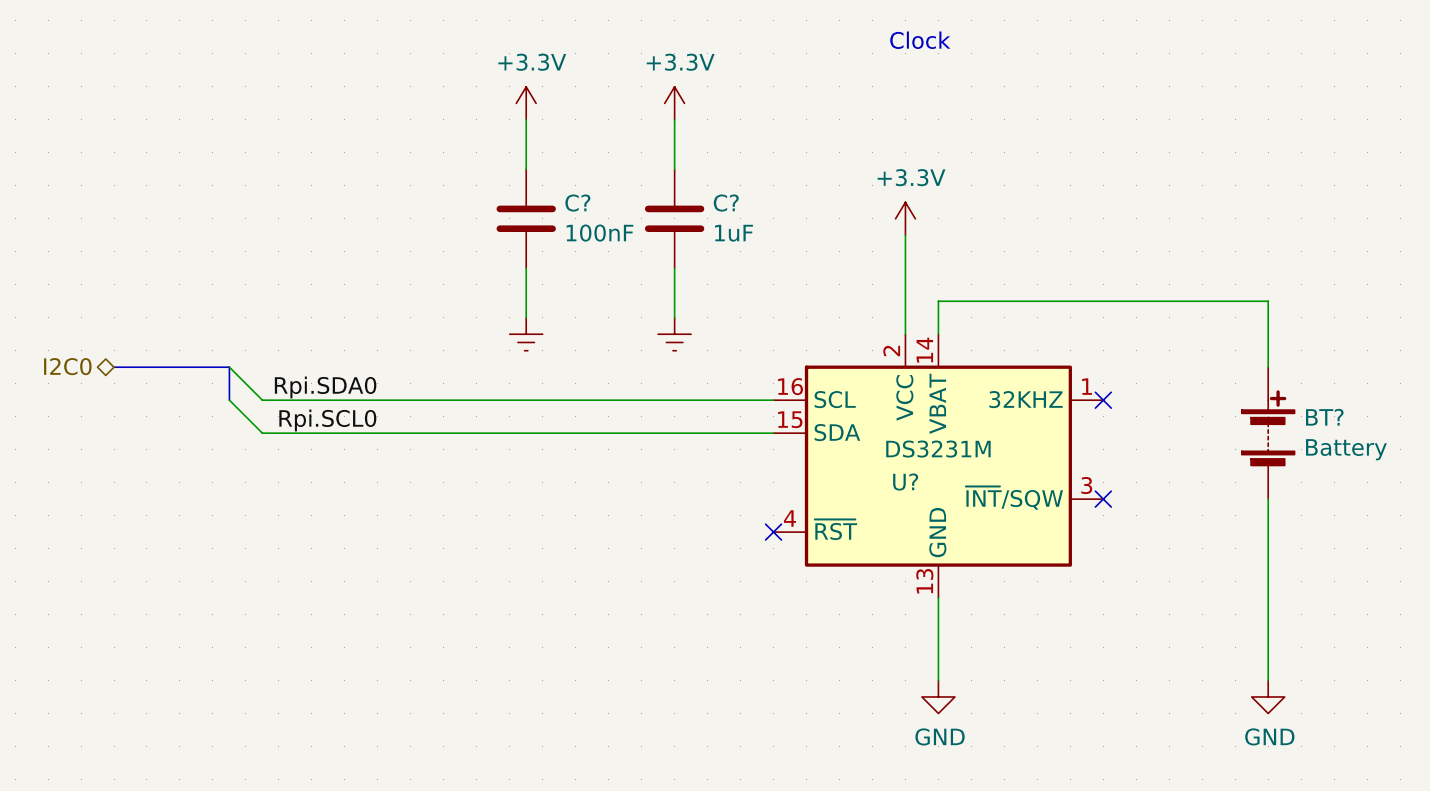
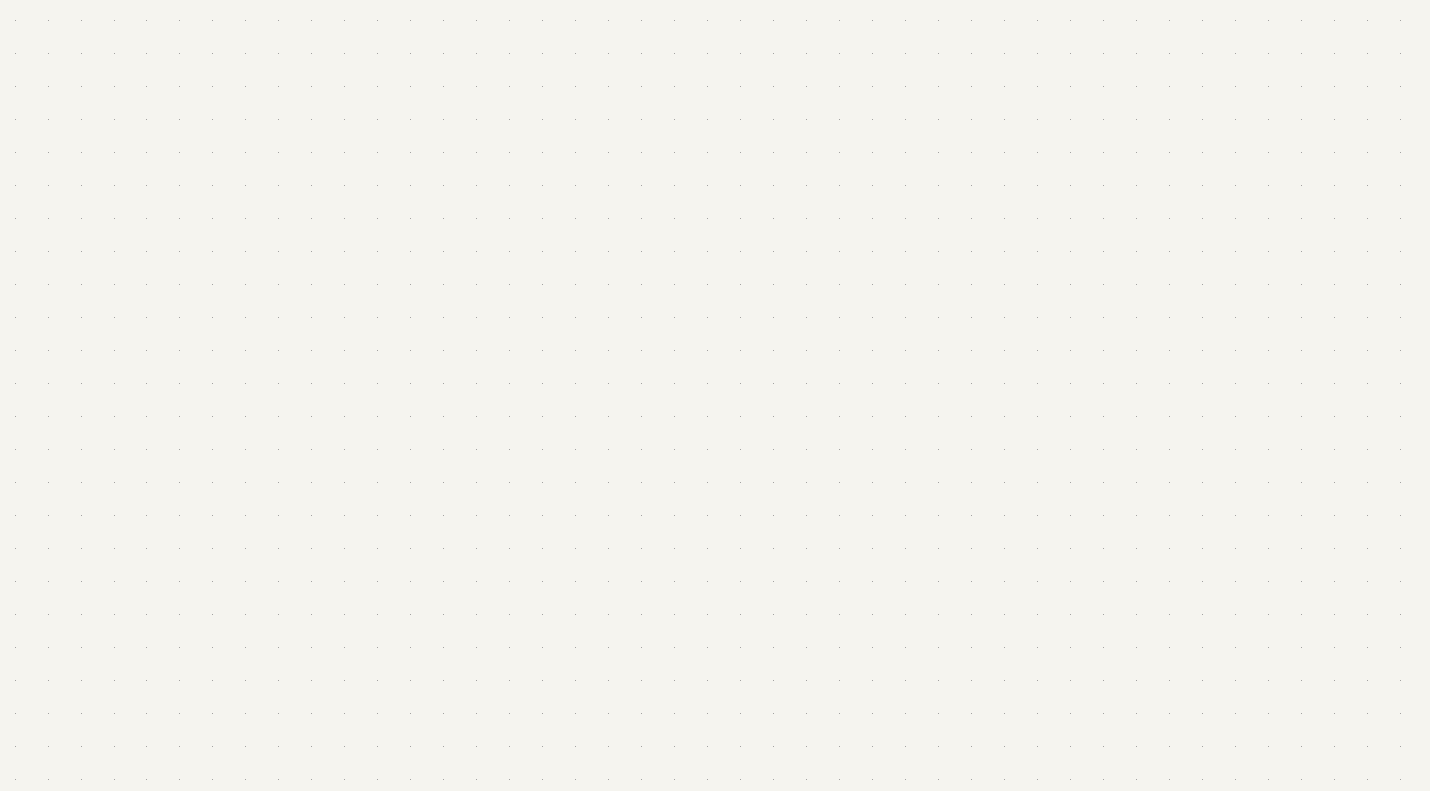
text: Clock (920, 40) -> none
power symbol: +3.3V (526, 103) -> none
power symbol: +3.3V (674, 103) -> none
wire: (526, 119) (526, 169) -> none
wire: (674, 119) (674, 169) -> none
C?: 100nF (526, 218) -> none
C?: 1uF (674, 218) -> none
power symbol: +3.3V (905, 218) -> none
wire: (905, 235) (905, 334) -> none
wire: (526, 268) (526, 317) -> none
wire: (674, 268) (674, 317) -> none
power symbol: (526, 334) -> none
power symbol: (674, 334) -> none
wire: (938, 334) (938, 301) (1268, 301) (1268, 367) -> none
hierarchical label: I2C0 (67, 366) -> none
bus: (114, 367) (229, 367) (229, 400) -> none
wire: (229, 367) (262, 400) (773, 400) -> none
label: Rpi.SDA0 (325, 387) -> none
wire: (229, 400) (262, 433) (773, 433) -> none
no-connect mark: (1103, 400) -> none
label: Rpi.SCL0 (327, 420) -> none
BT?: Battery (1268, 433) -> none
U?: DS3231M (938, 466) -> none
no-connect mark: (1103, 499) -> none
wire: (1268, 499) (1268, 680) -> none
no-connect mark: (773, 532) -> none
wire: (938, 598) (938, 680) -> none
power symbol: GND (938, 696) -> none
power symbol: GND (1268, 696) -> none

